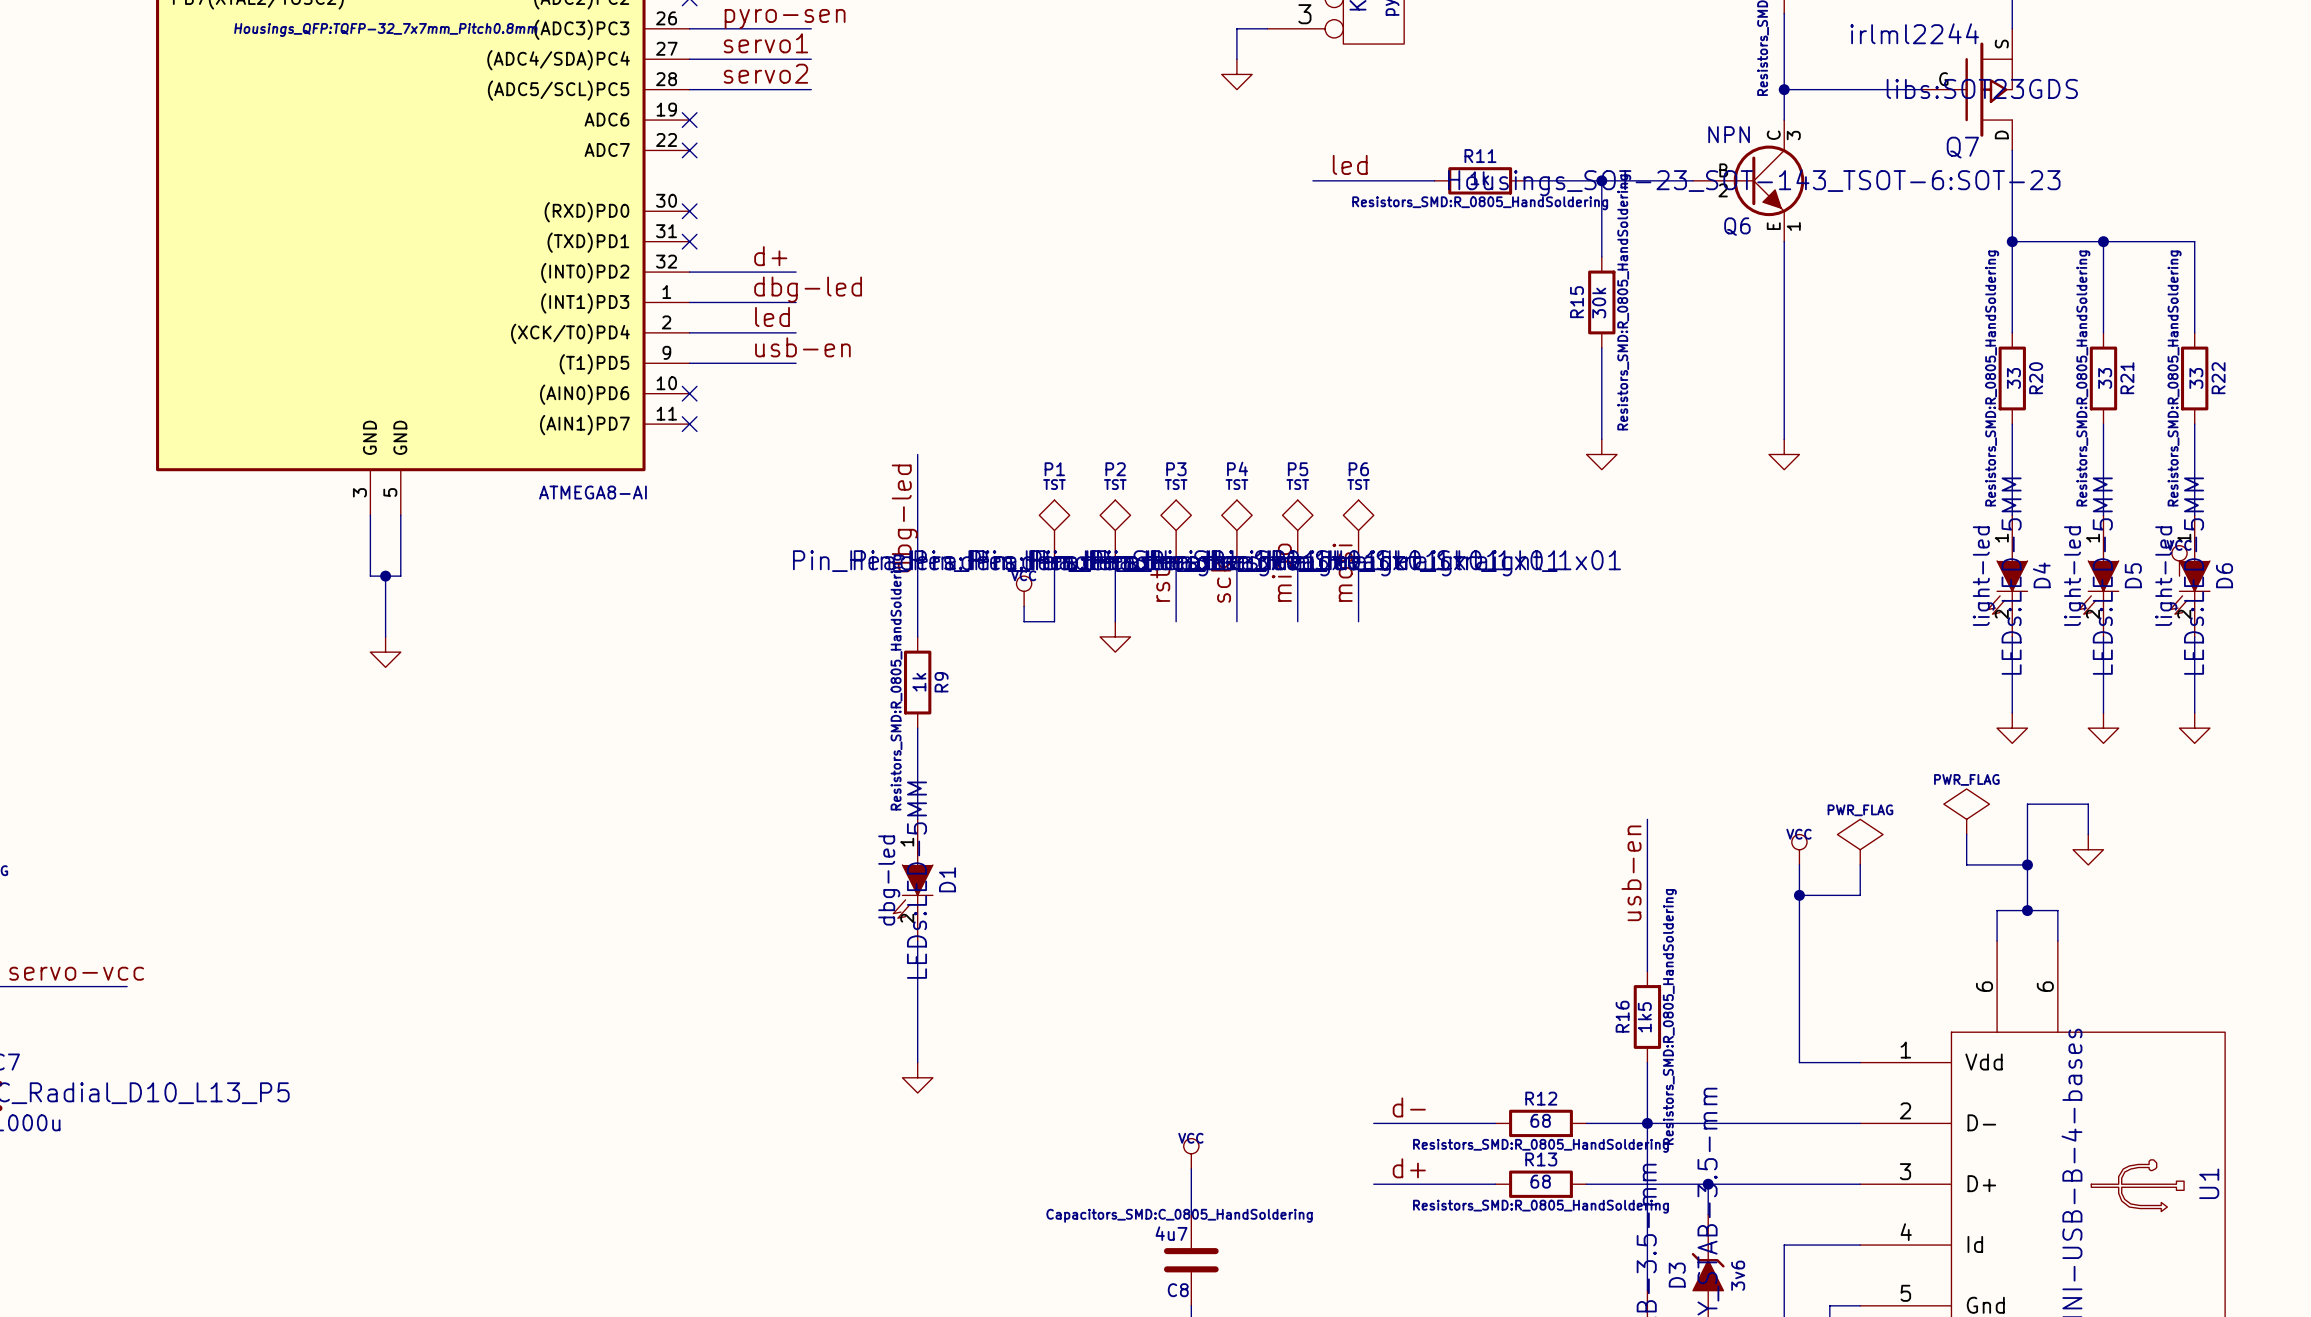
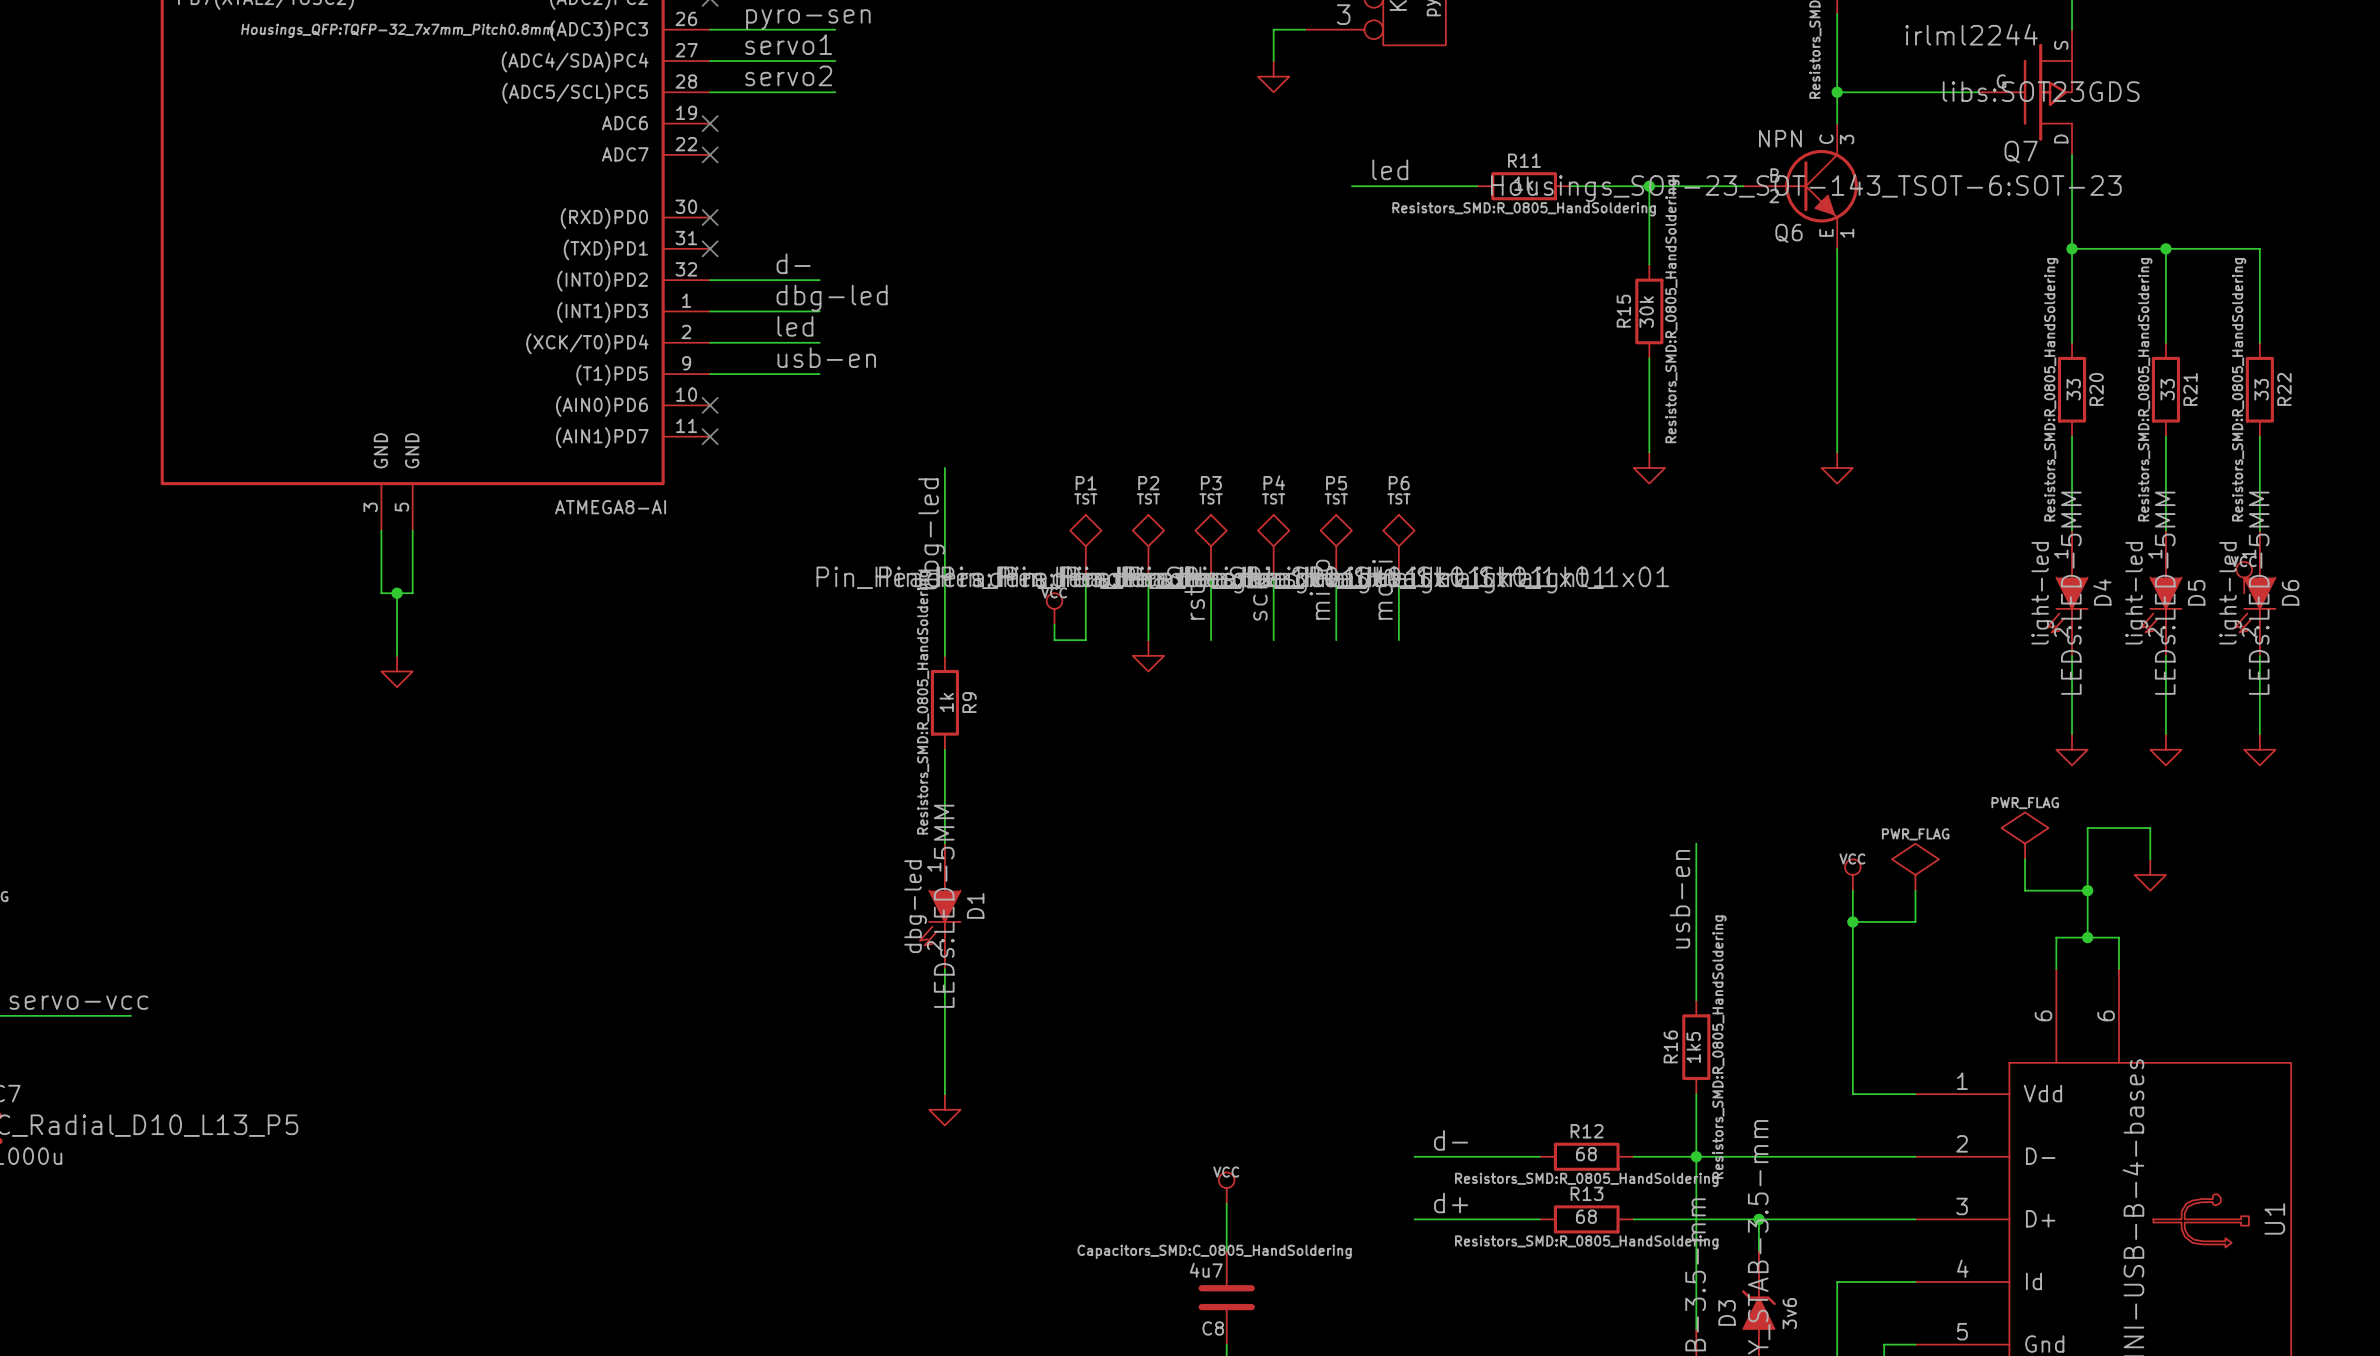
label: d+ (770, 256) -> d- (793, 263)

